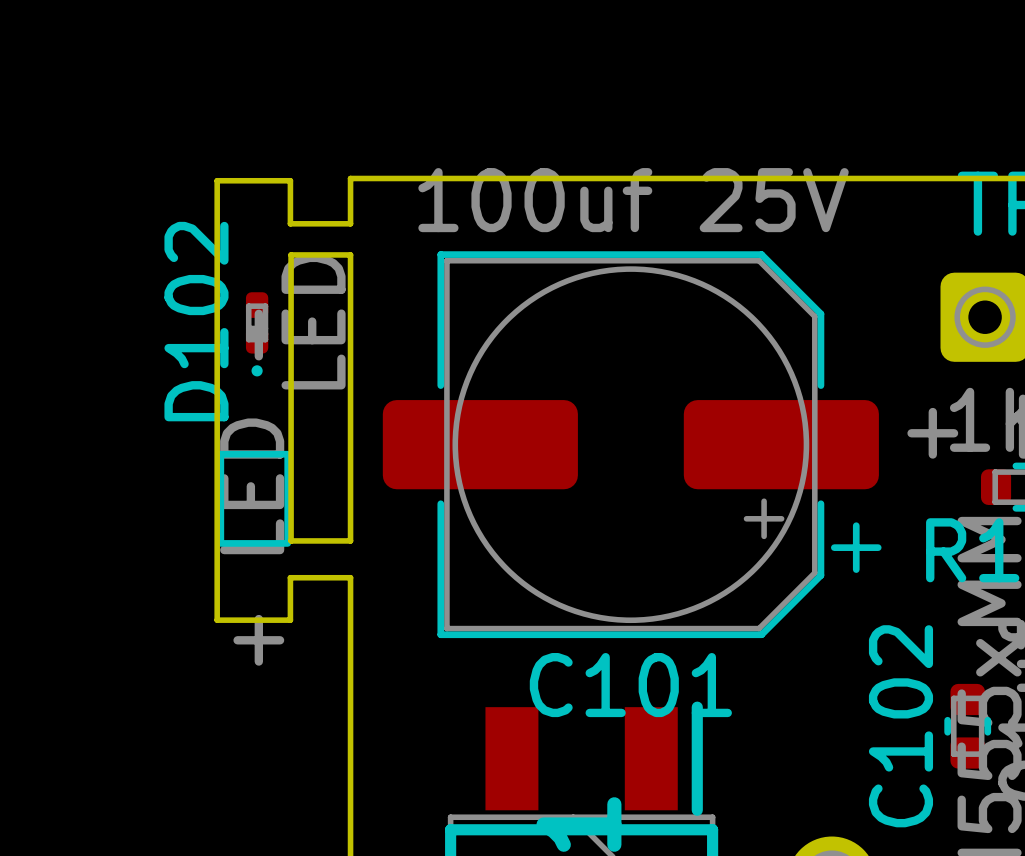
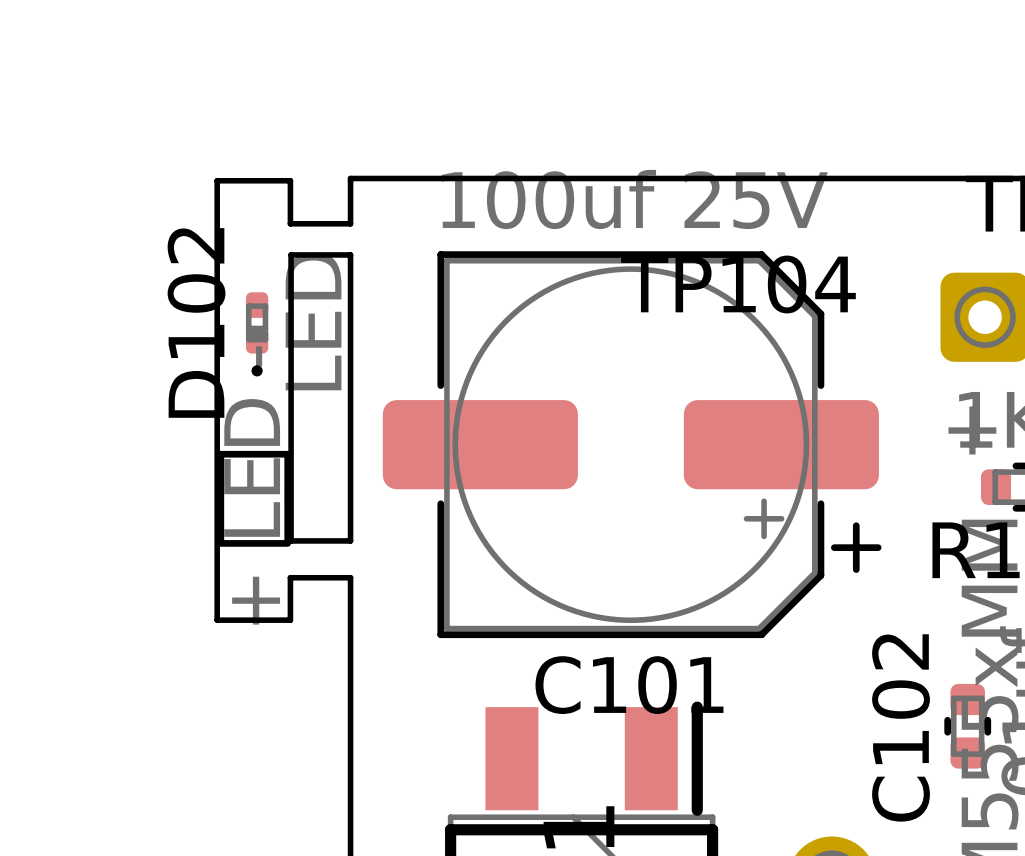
TP104: none -> (738, 284)

